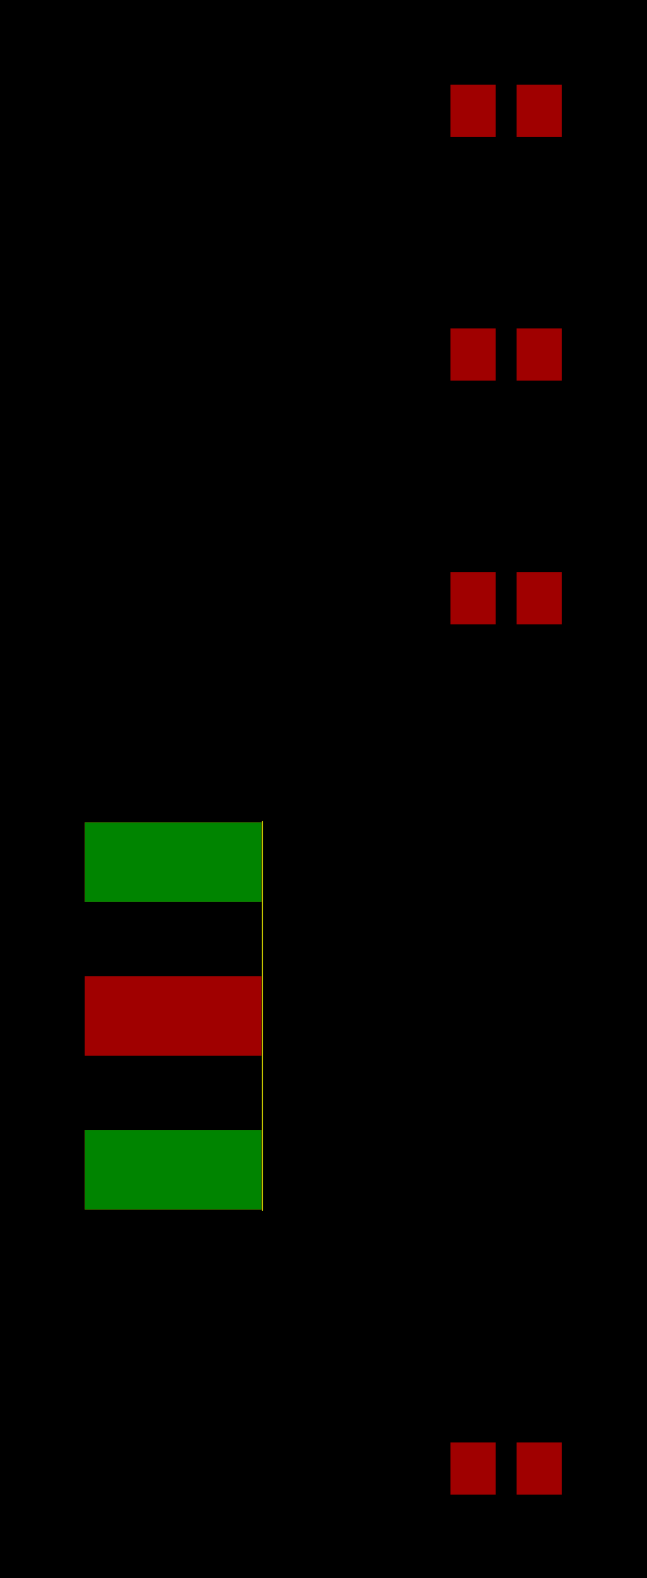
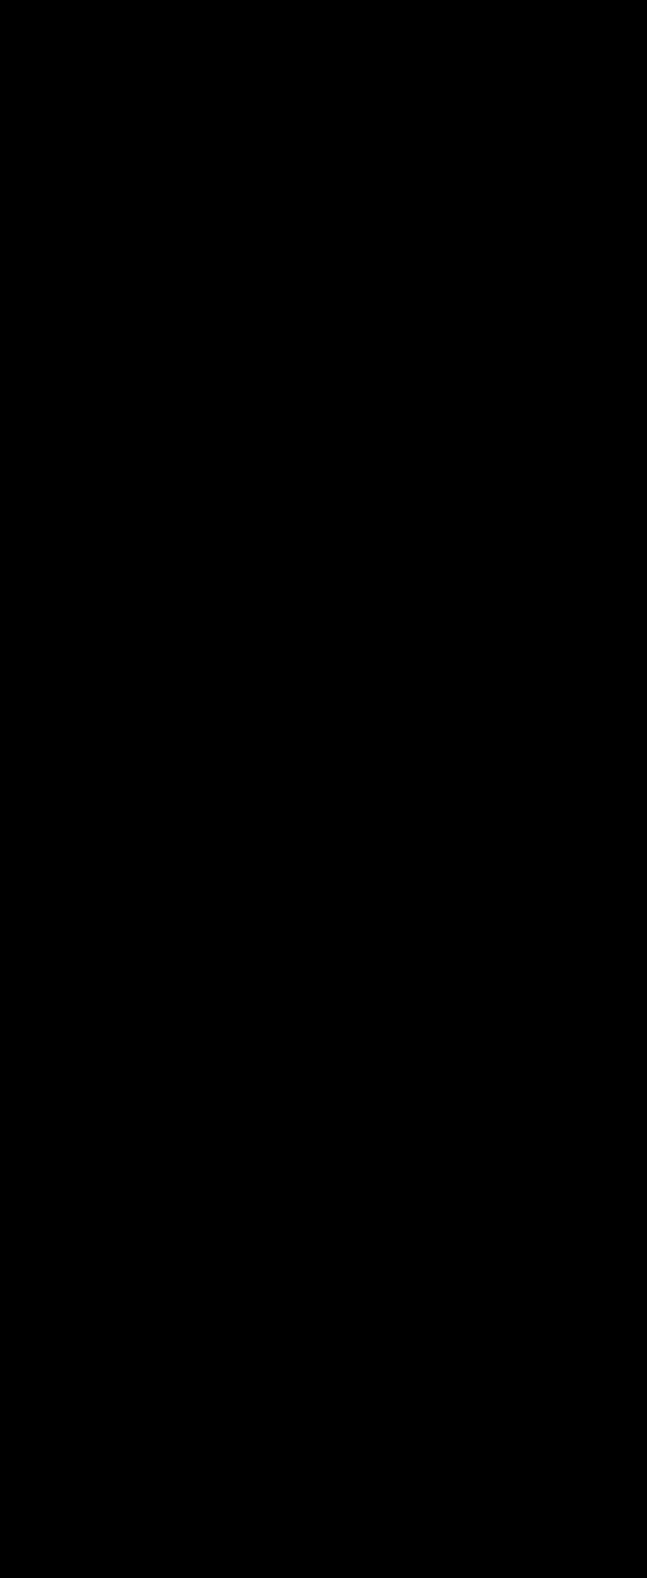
part: (506, 110) -> none
part: (506, 354) -> none
part: (506, 598) -> none
part: (173, 1015) -> none
part: (506, 1468) -> none

